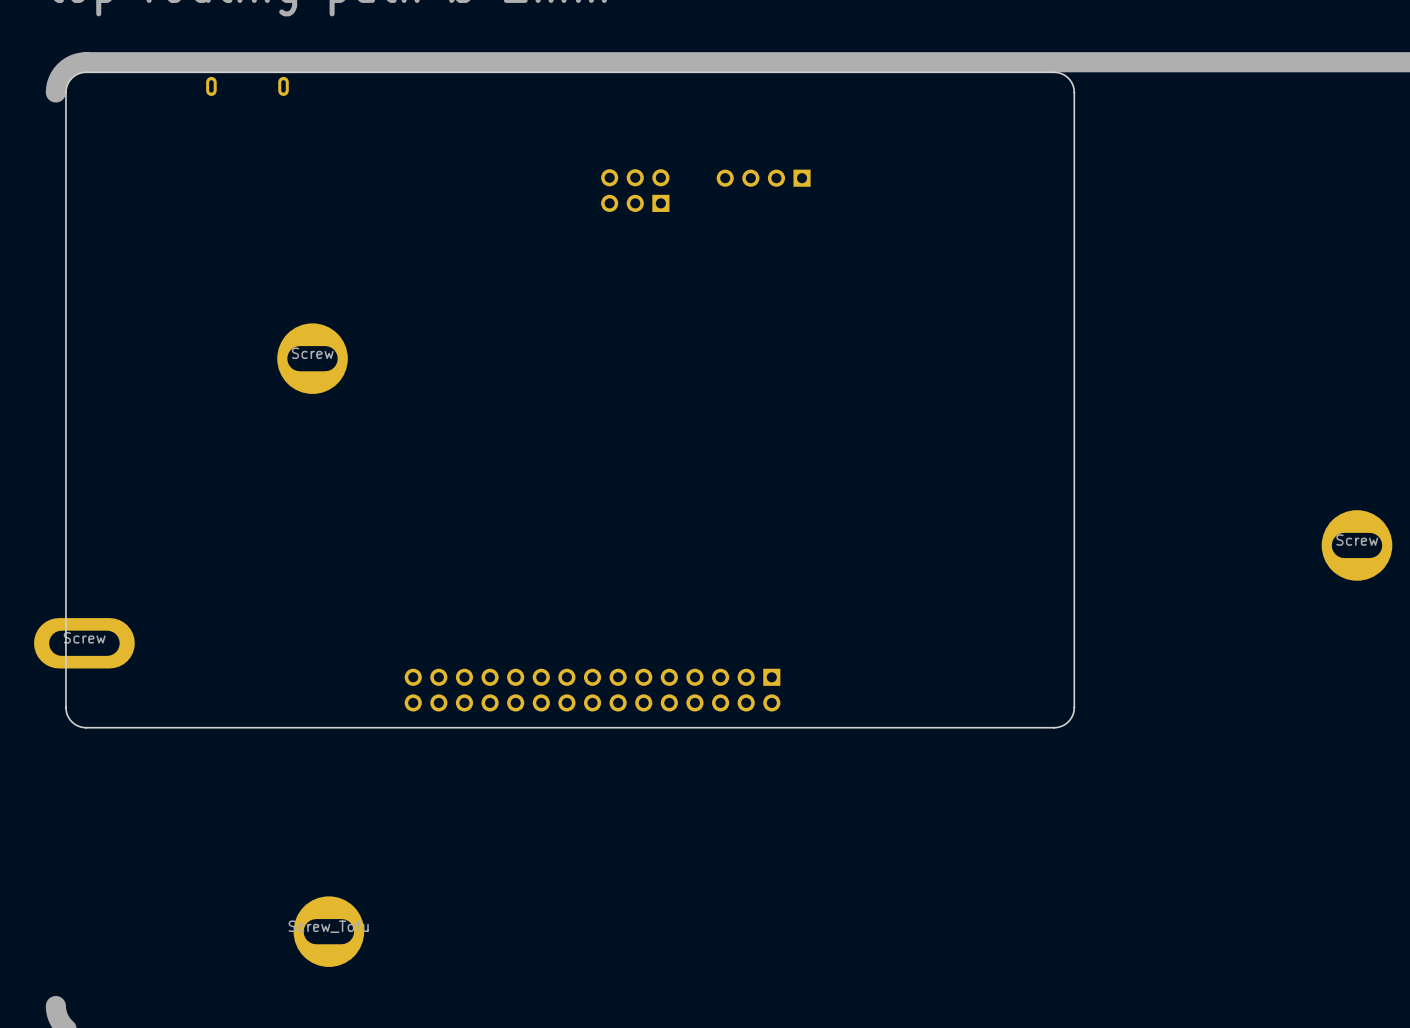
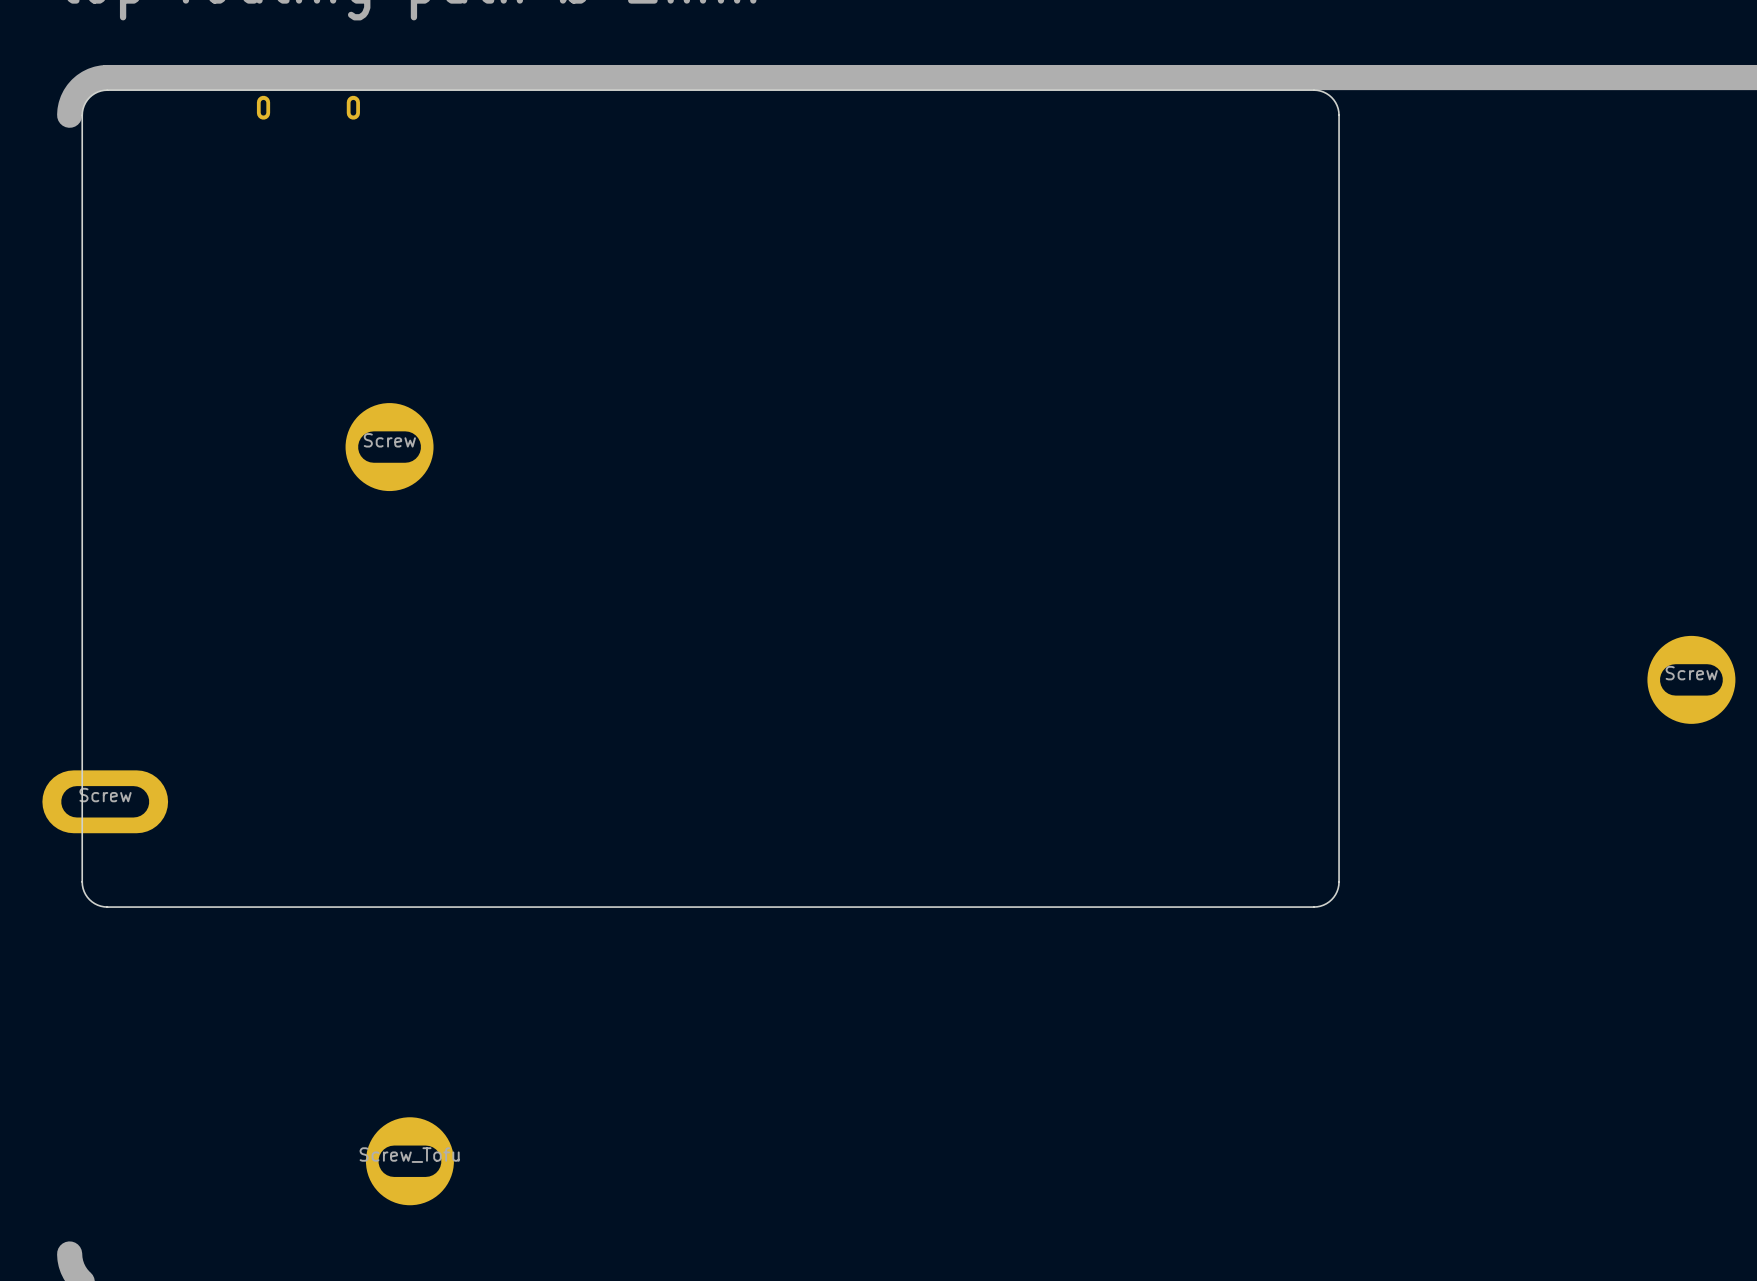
part: (763, 178) -> none
part: (635, 190) -> none
part: (592, 690) -> none

